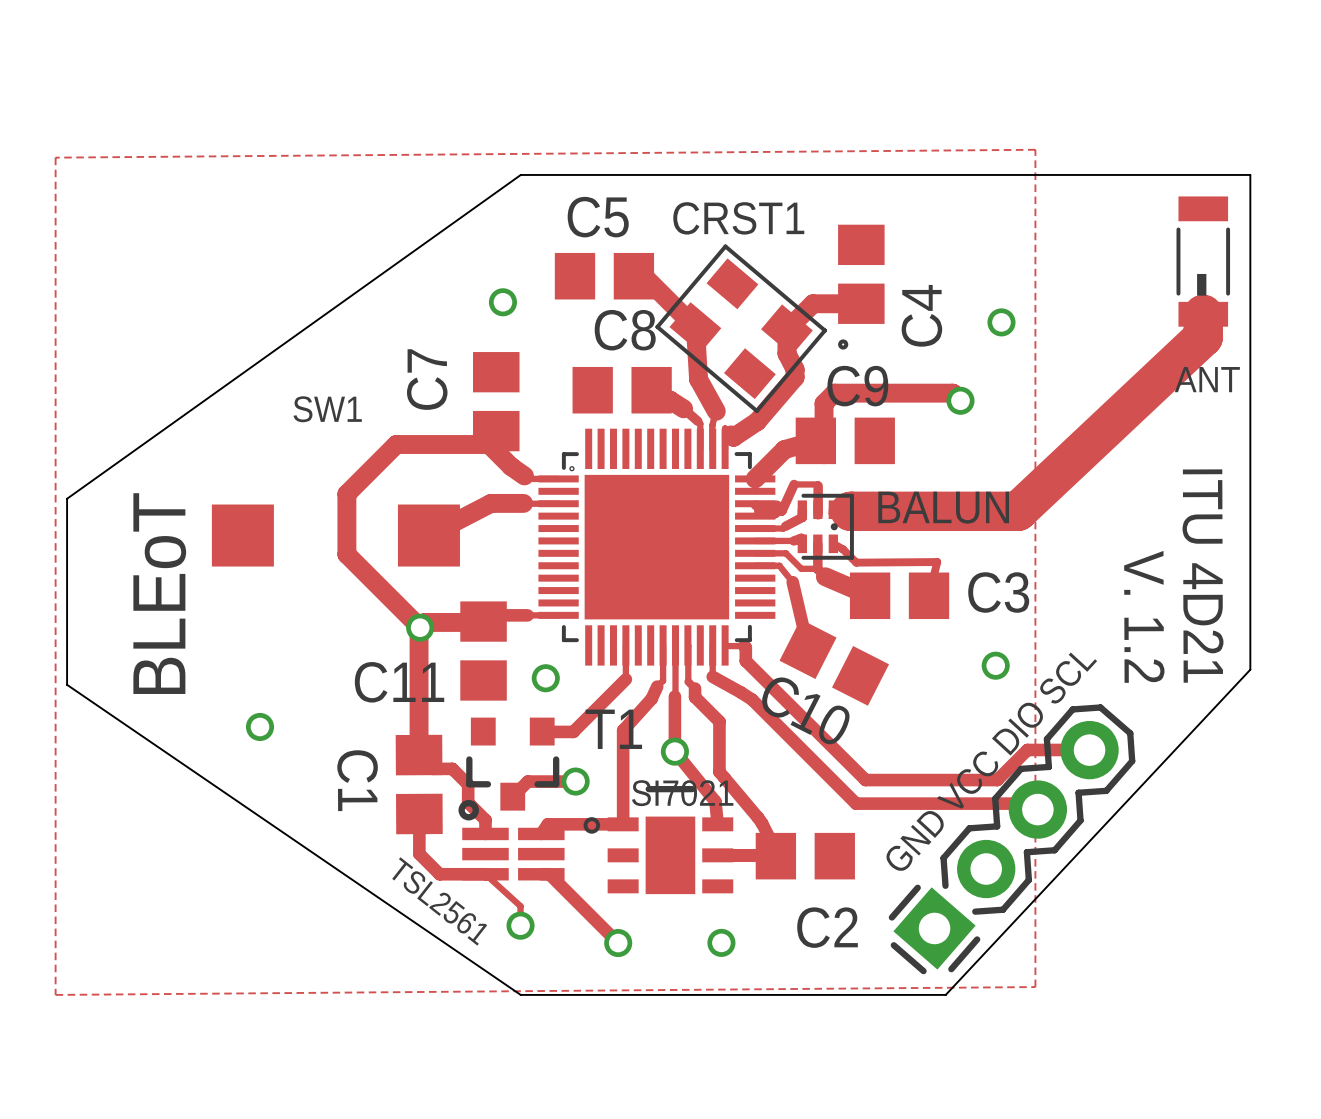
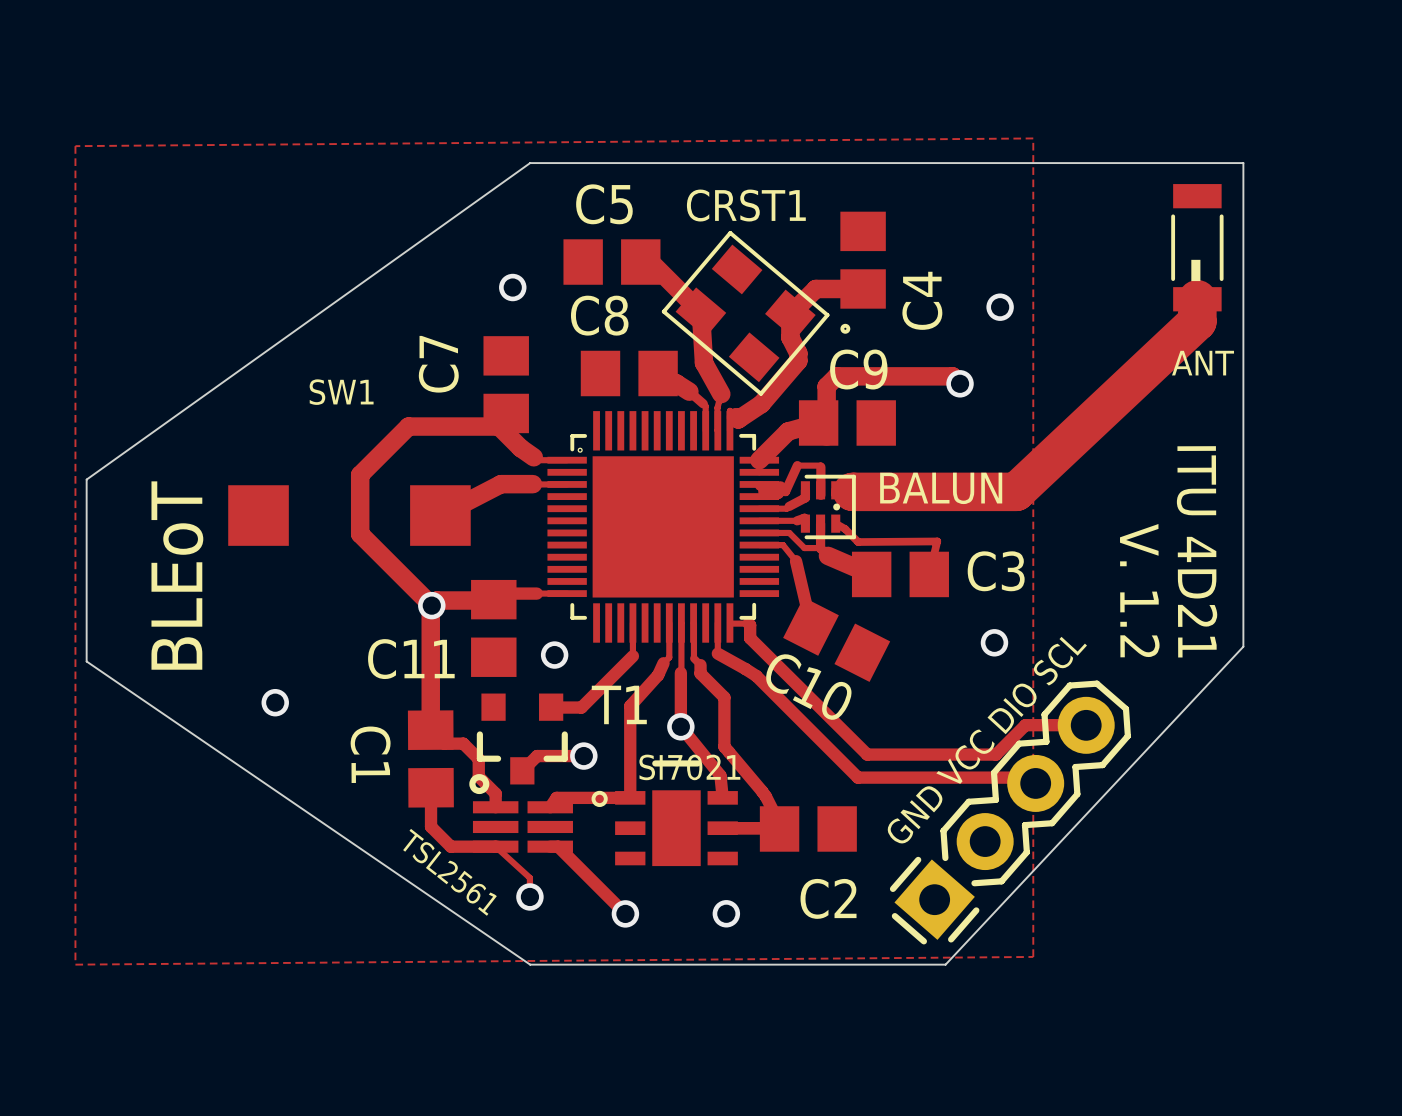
C8 name position: C8 (625, 330) -> C8 (599, 315)

